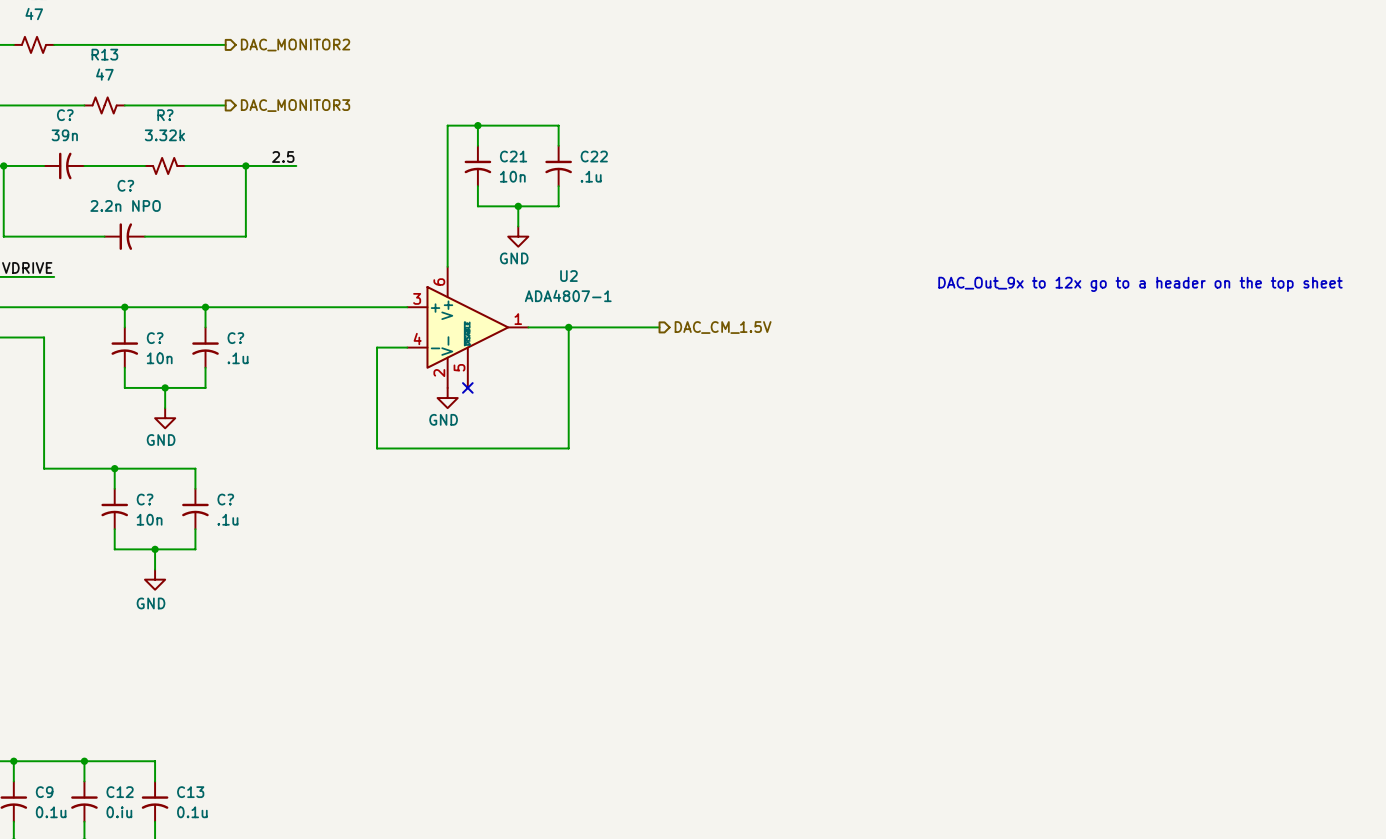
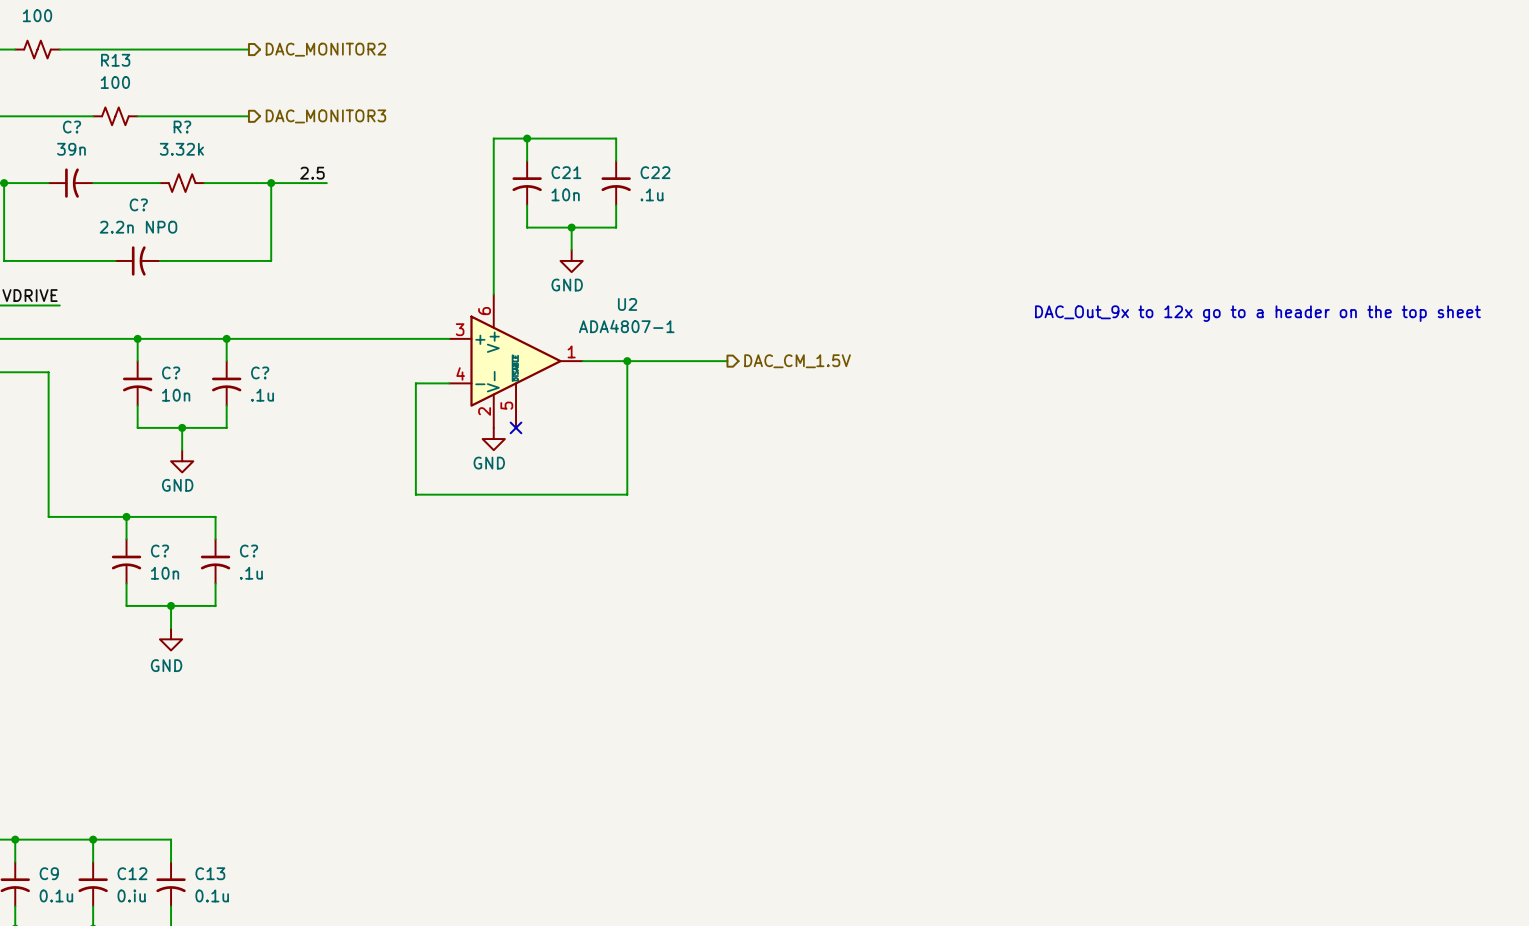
part value: 47 (34, 14) -> 100 (37, 15)
R13 value: 47 (104, 74) -> 100 (115, 82)

